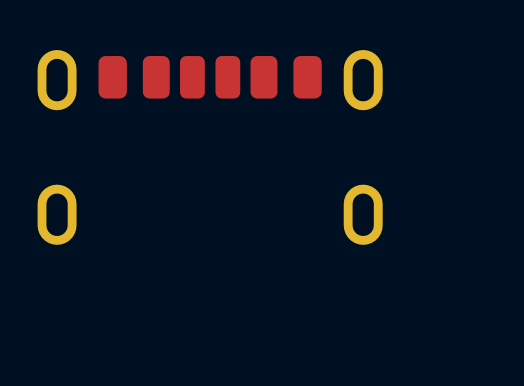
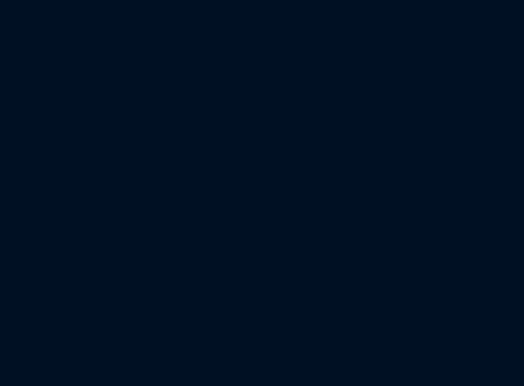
part: (210, 147) -> none

